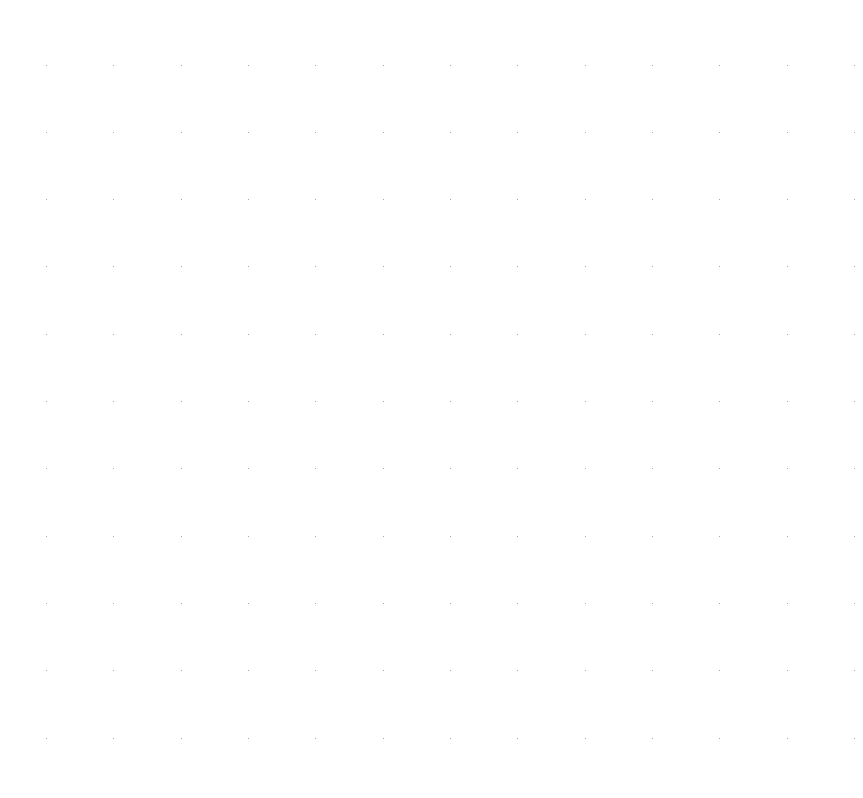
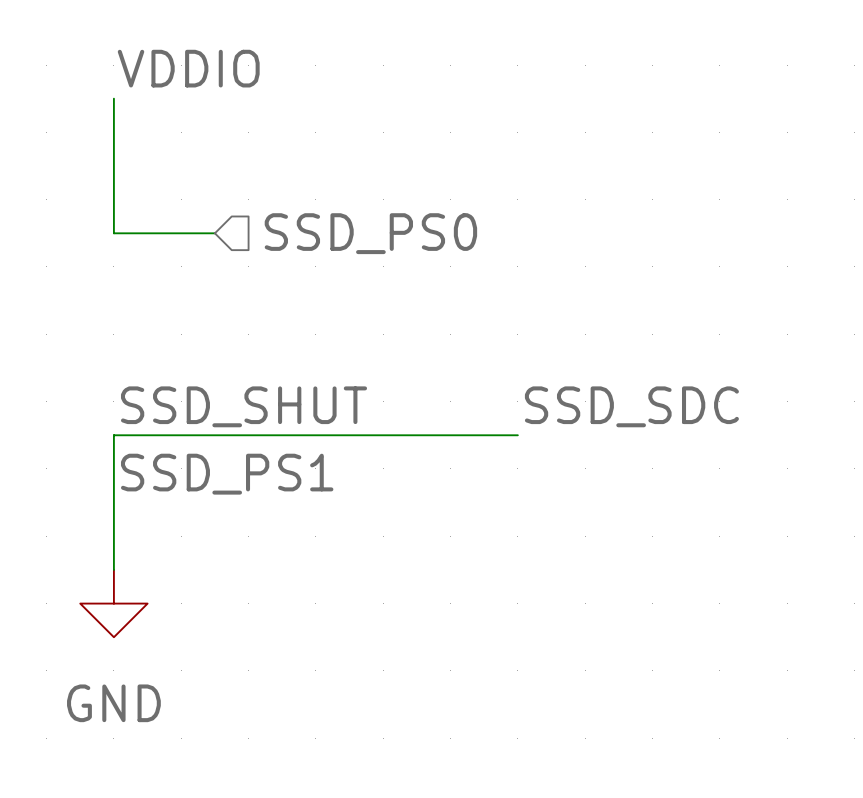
label: none -> VDDIO (188, 68)
wire: none -> (113, 98) (113, 233) (214, 233)
hierarchical label: none -> SSD_PS0 (370, 233)
label: none -> SSD_SHUT (244, 406)
label: none -> SSD_SDC (631, 406)
wire: none -> (517, 435) (113, 435) (113, 569)
label: none -> SSD_PS1 (227, 474)
power symbol: none -> GND (113, 603)

